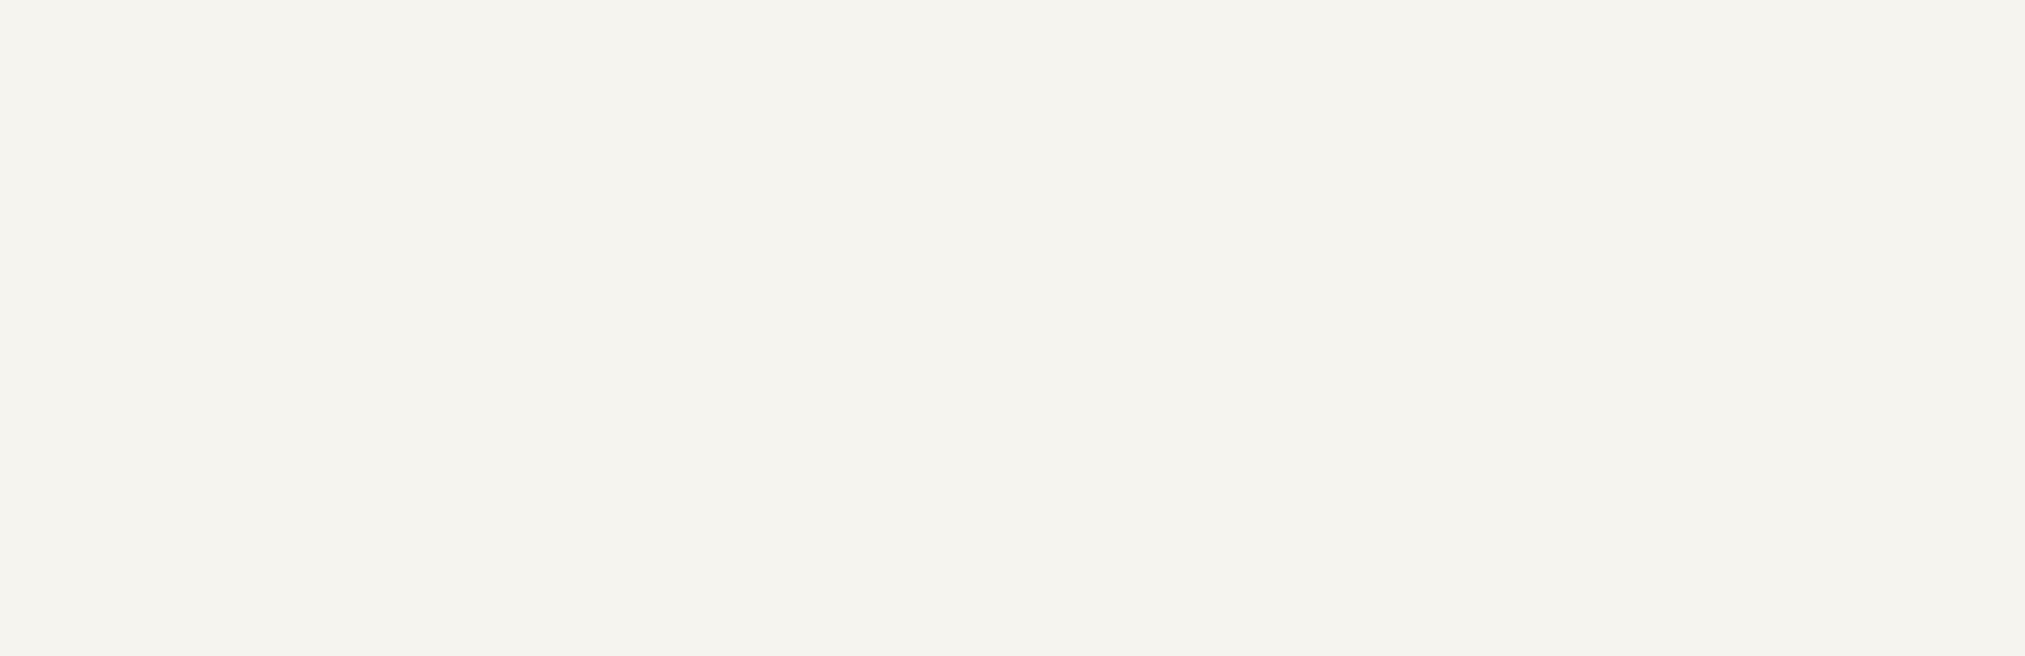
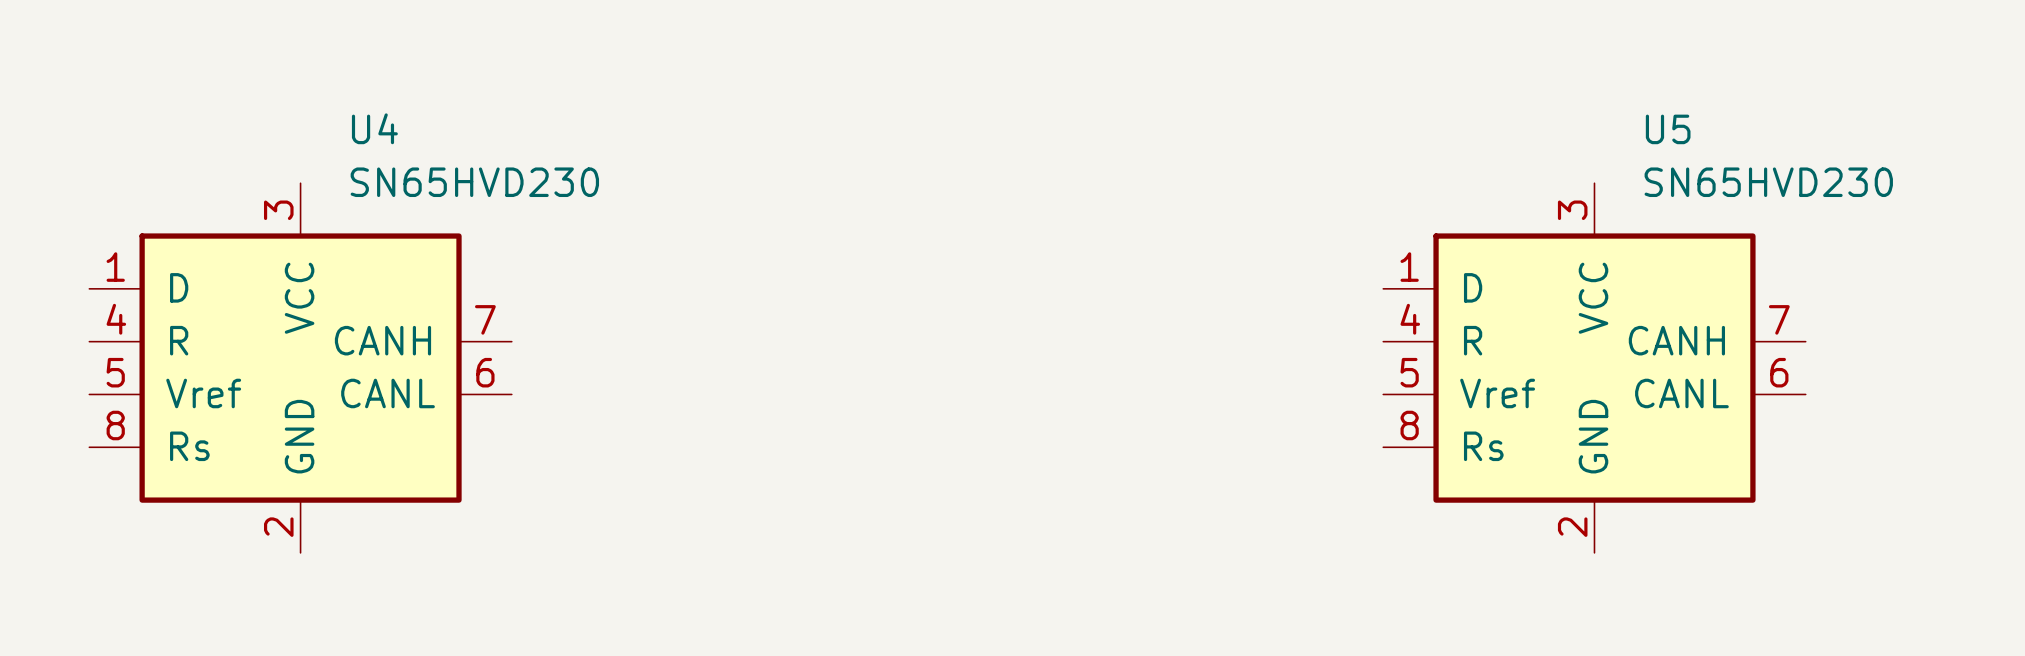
U4: none -> SN65HVD230 (300, 368)
U5: none -> SN65HVD230 (1594, 368)

